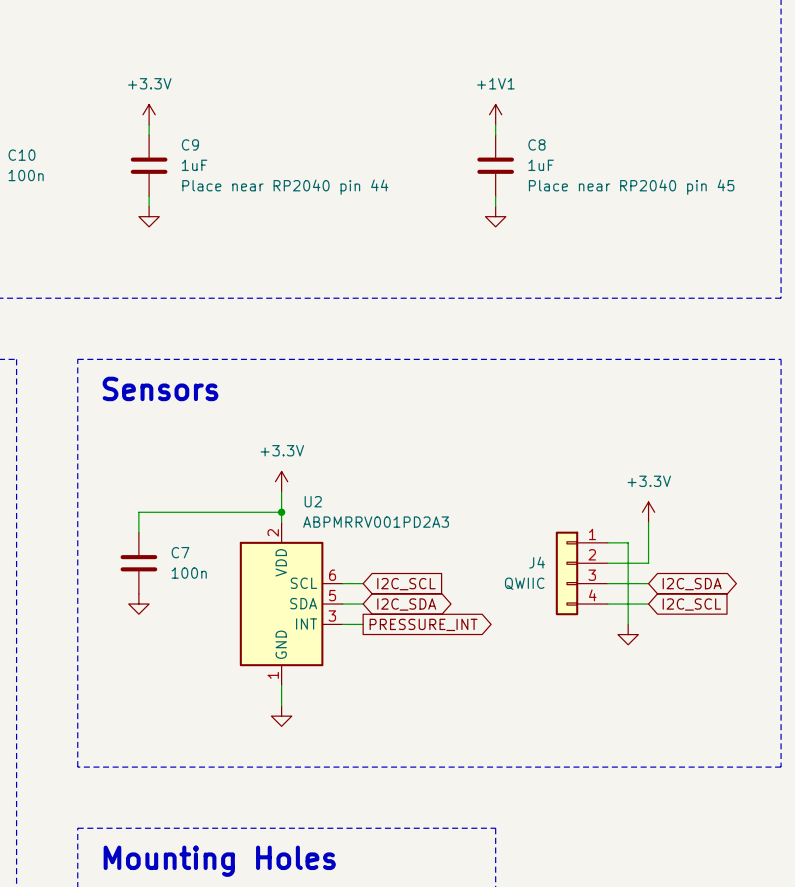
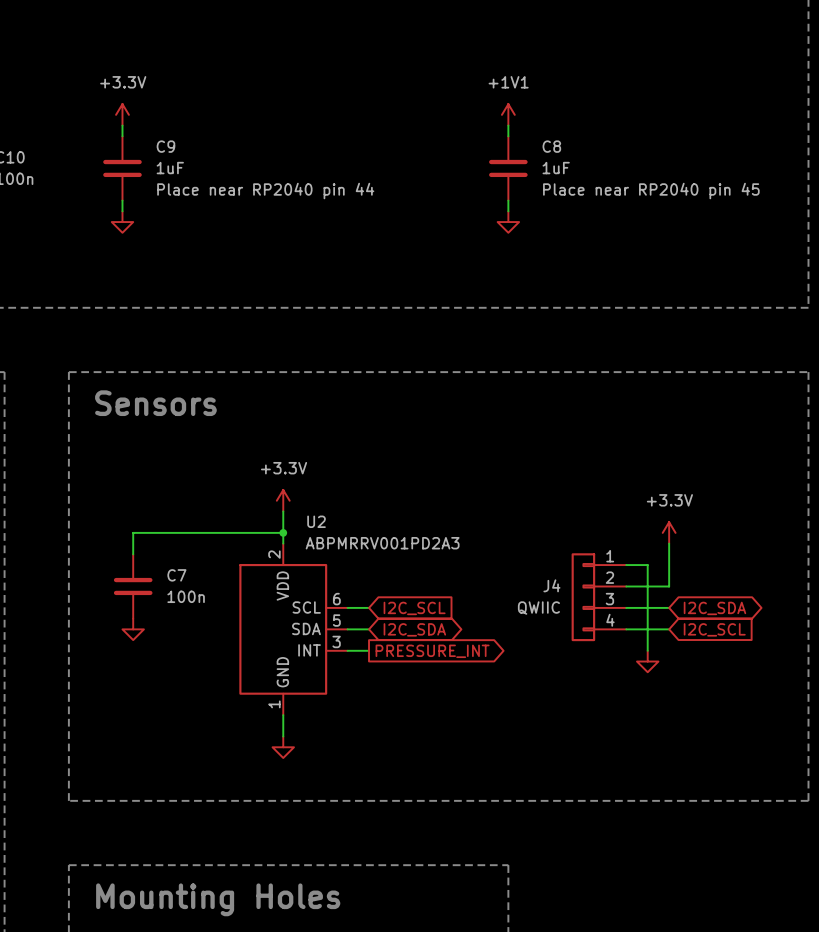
power symbol position: +3.3V (149, 114) -> +3.3V (122, 114)
wire: (149, 124) (149, 135) -> (122, 125) (122, 136)
C9 position: (149, 165) -> (122, 168)
wire: (149, 196) (149, 206) -> (122, 200) (122, 211)
power symbol position: (149, 216) -> (122, 222)

